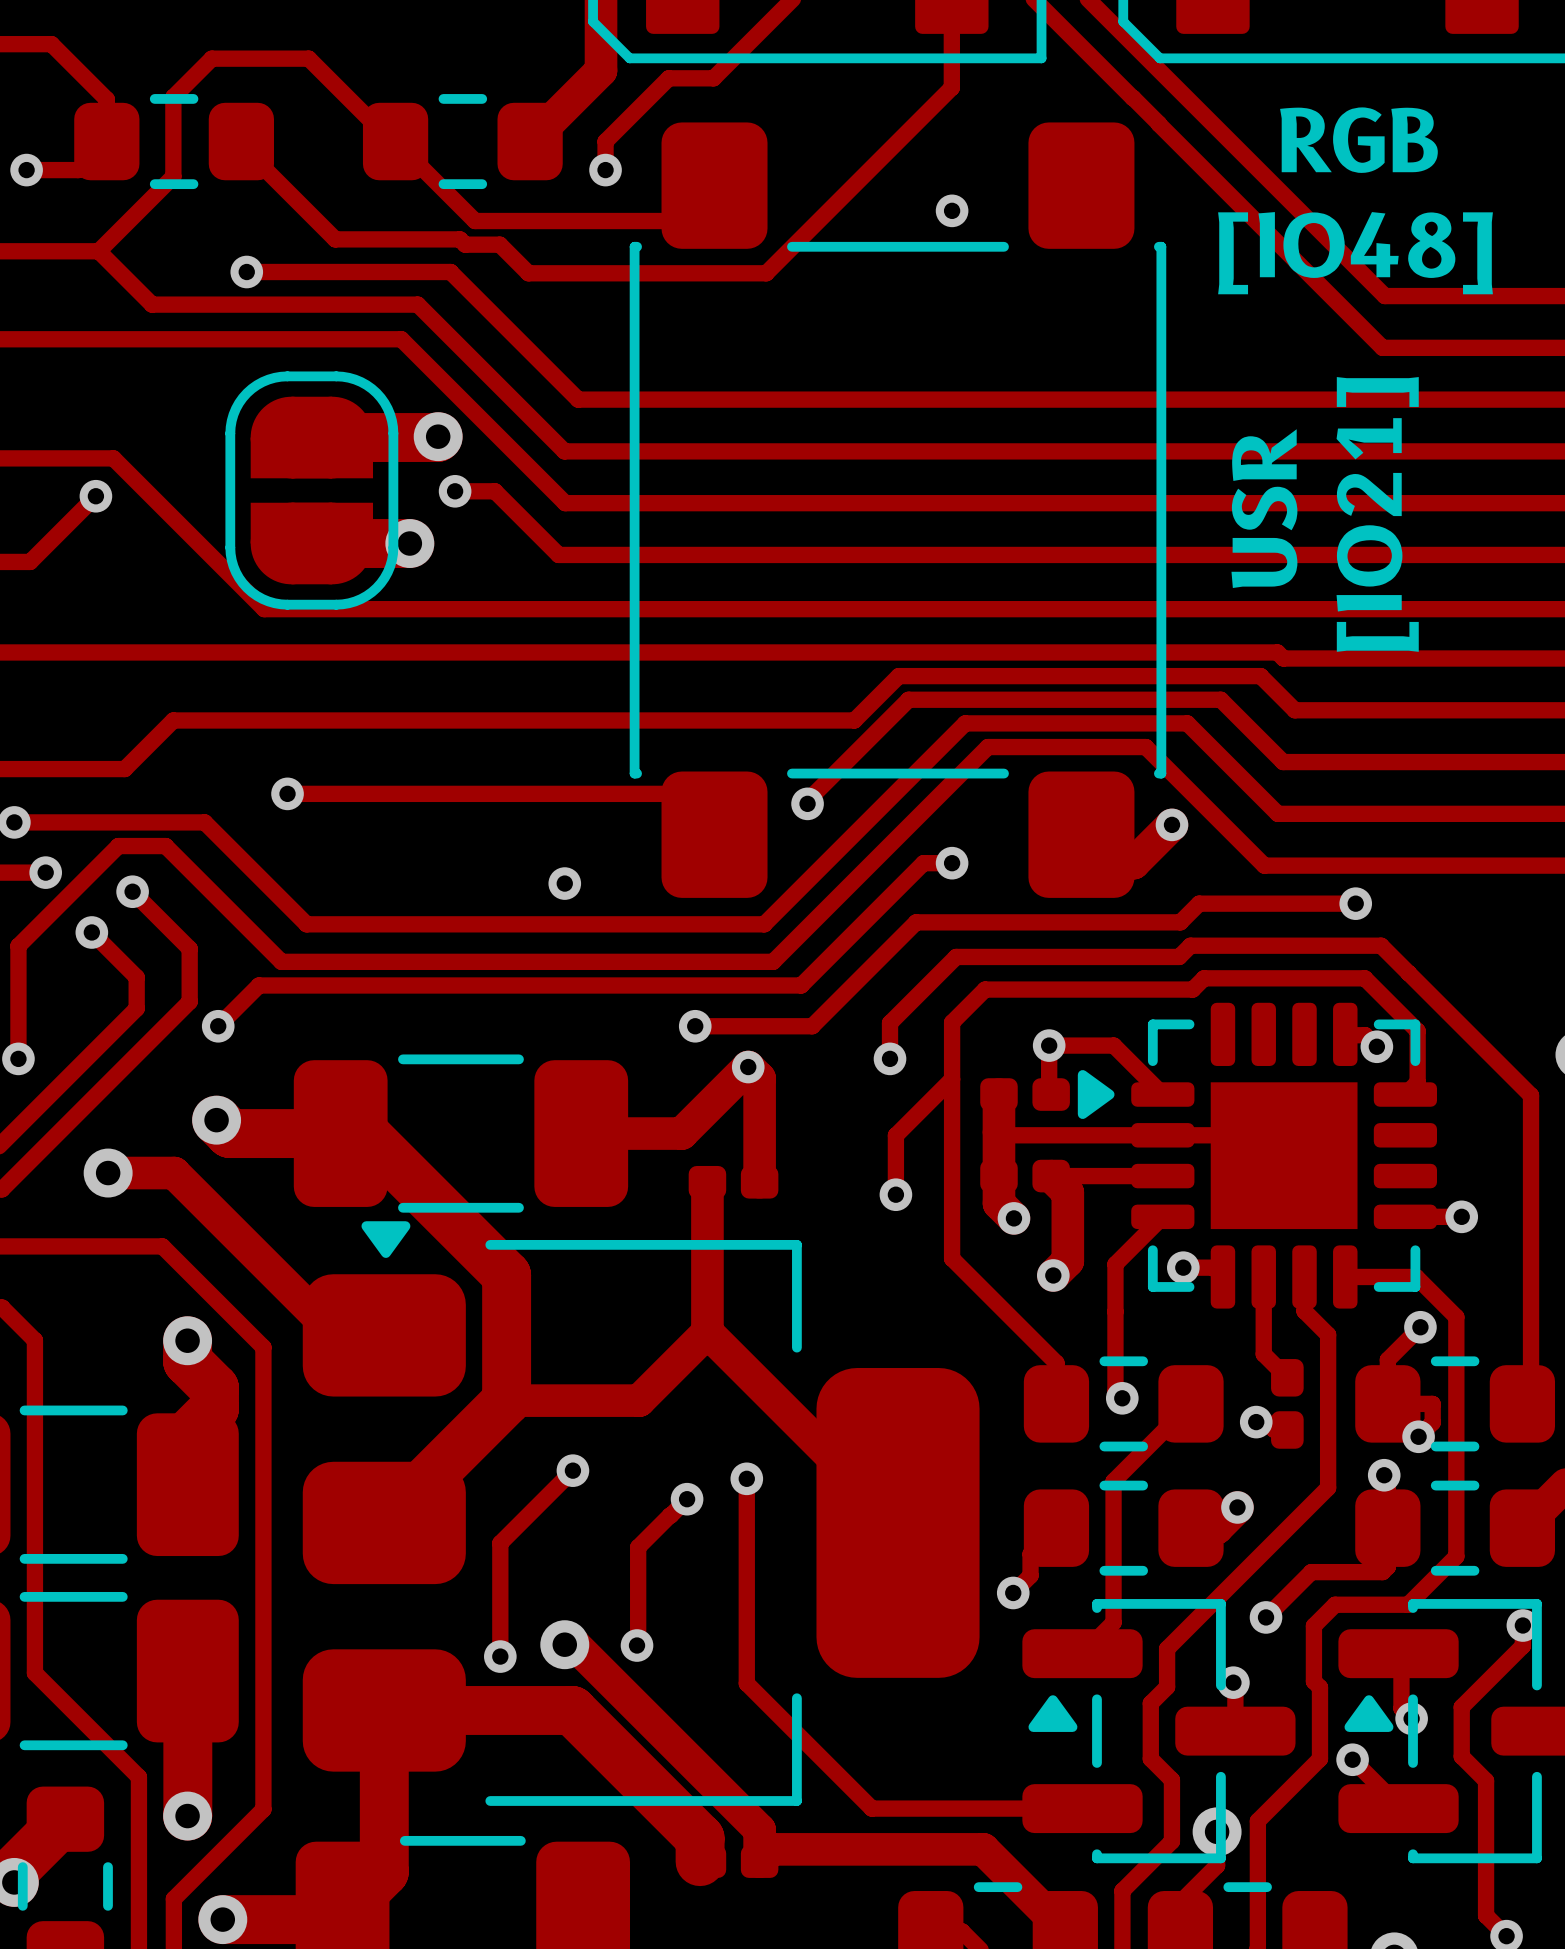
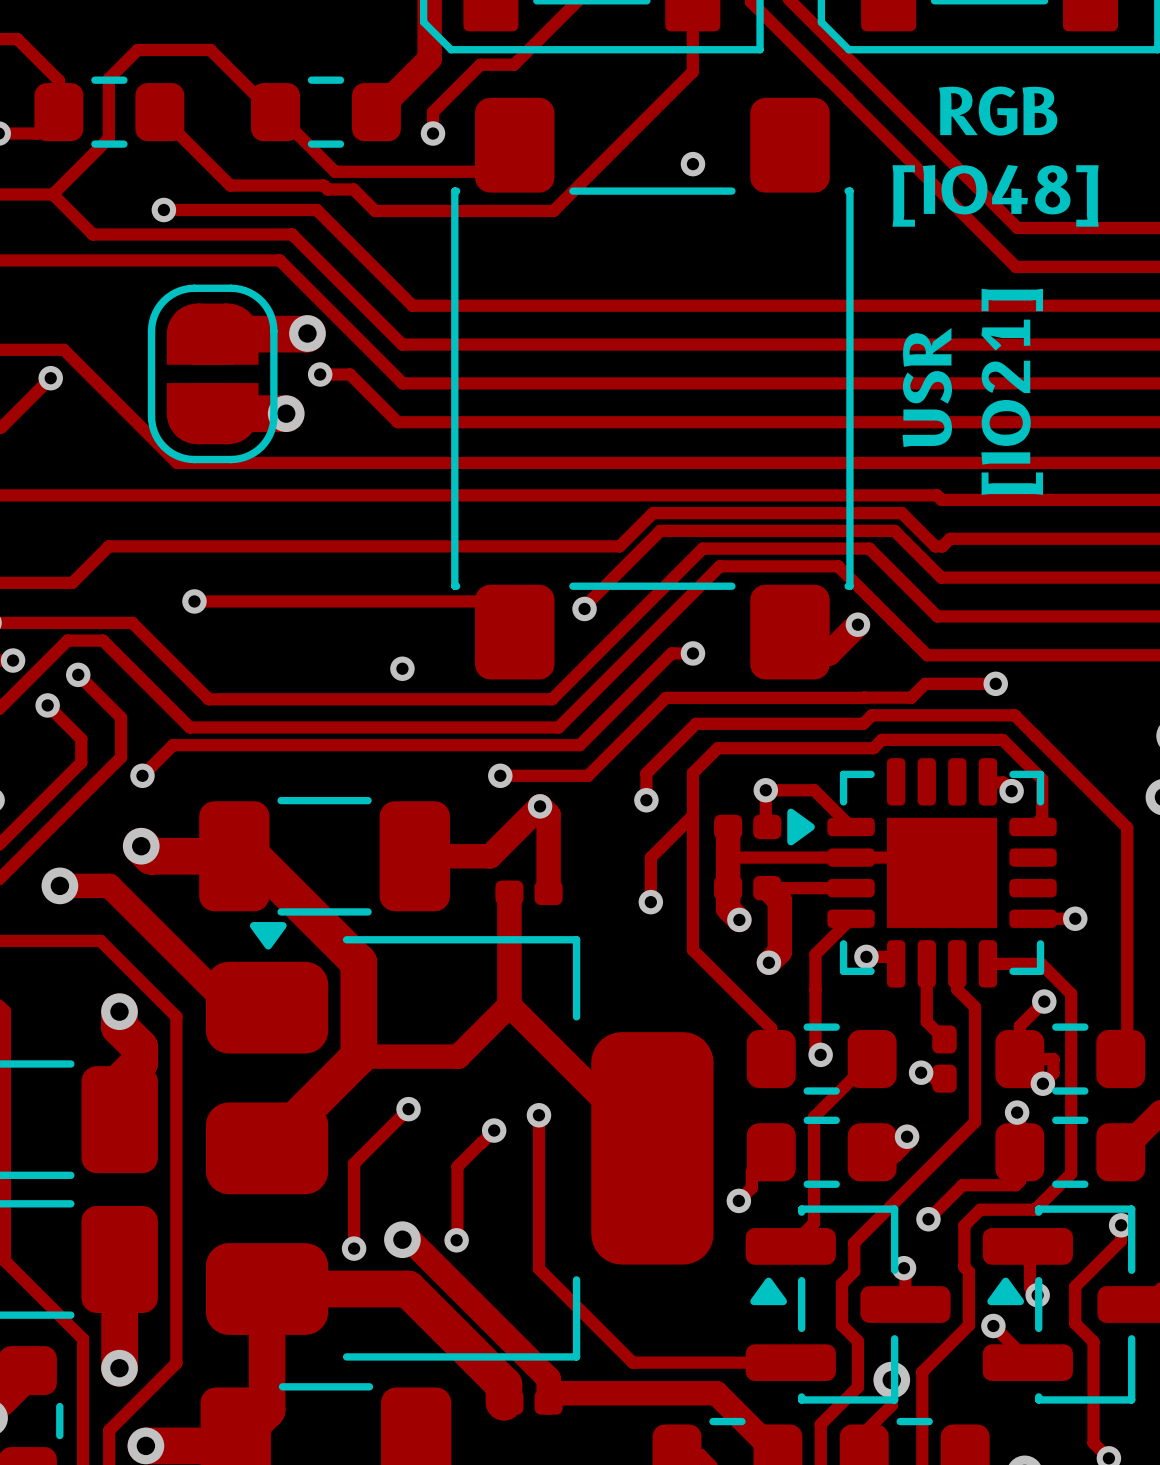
track: (1230, 676) (1260, 676) (1294, 710) -> (901, 513) (935, 546) (942, 546) (950, 538)
track: (1261, 903) (1199, 903) (1180, 922) -> (925, 683) (911, 697) (864, 697)

